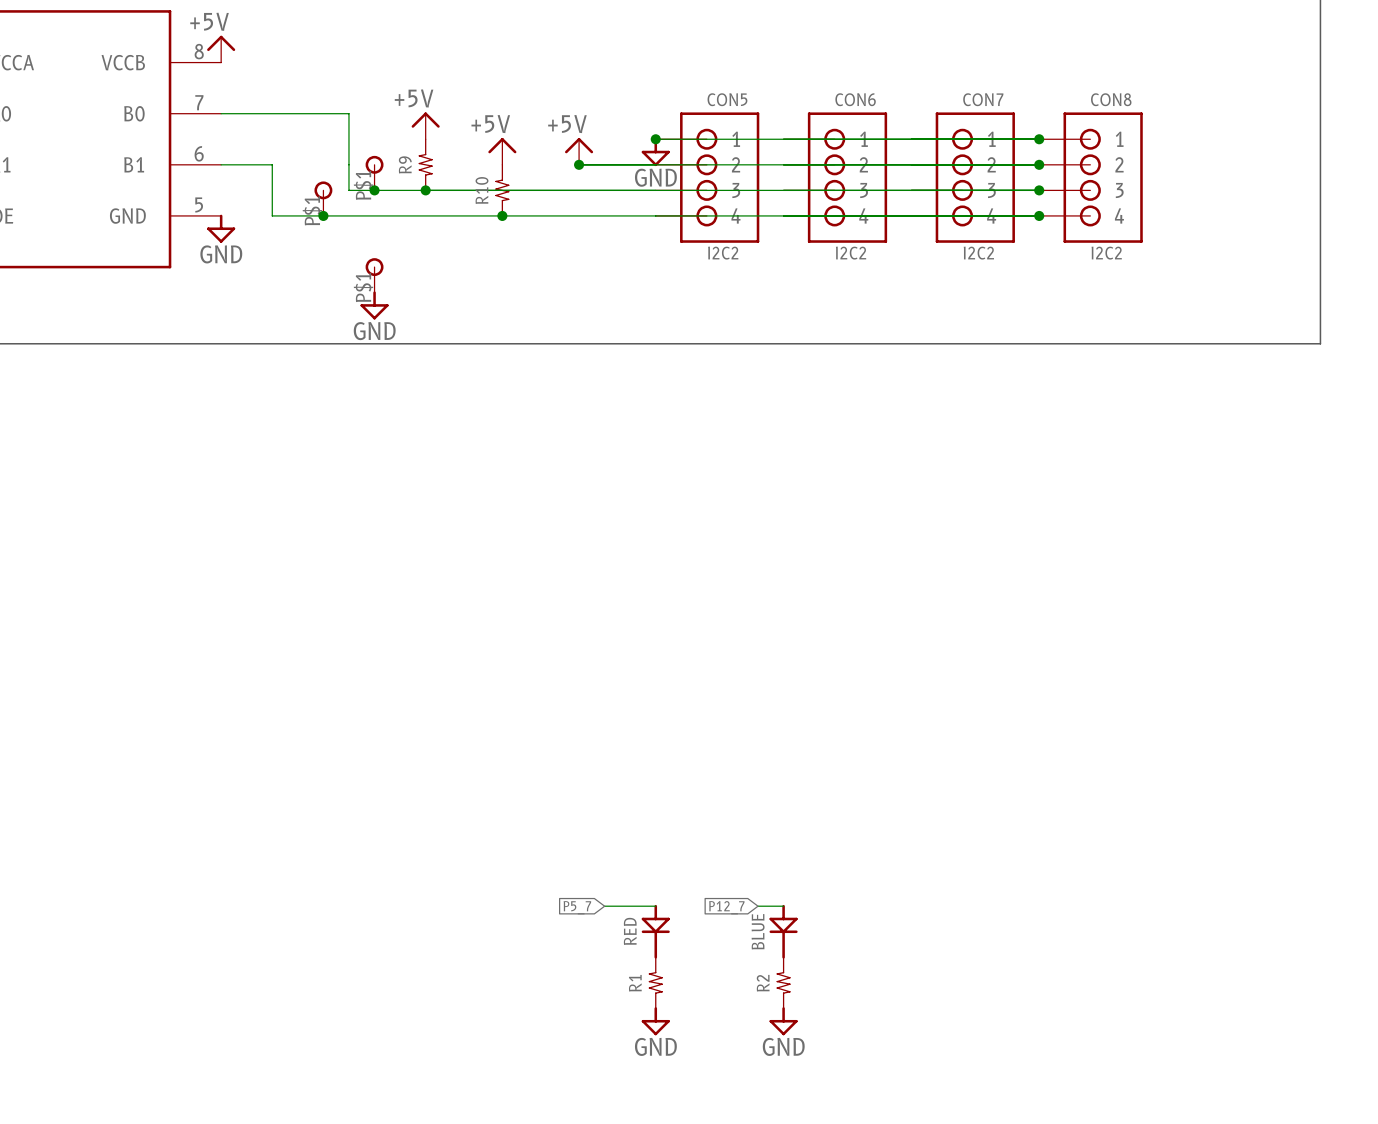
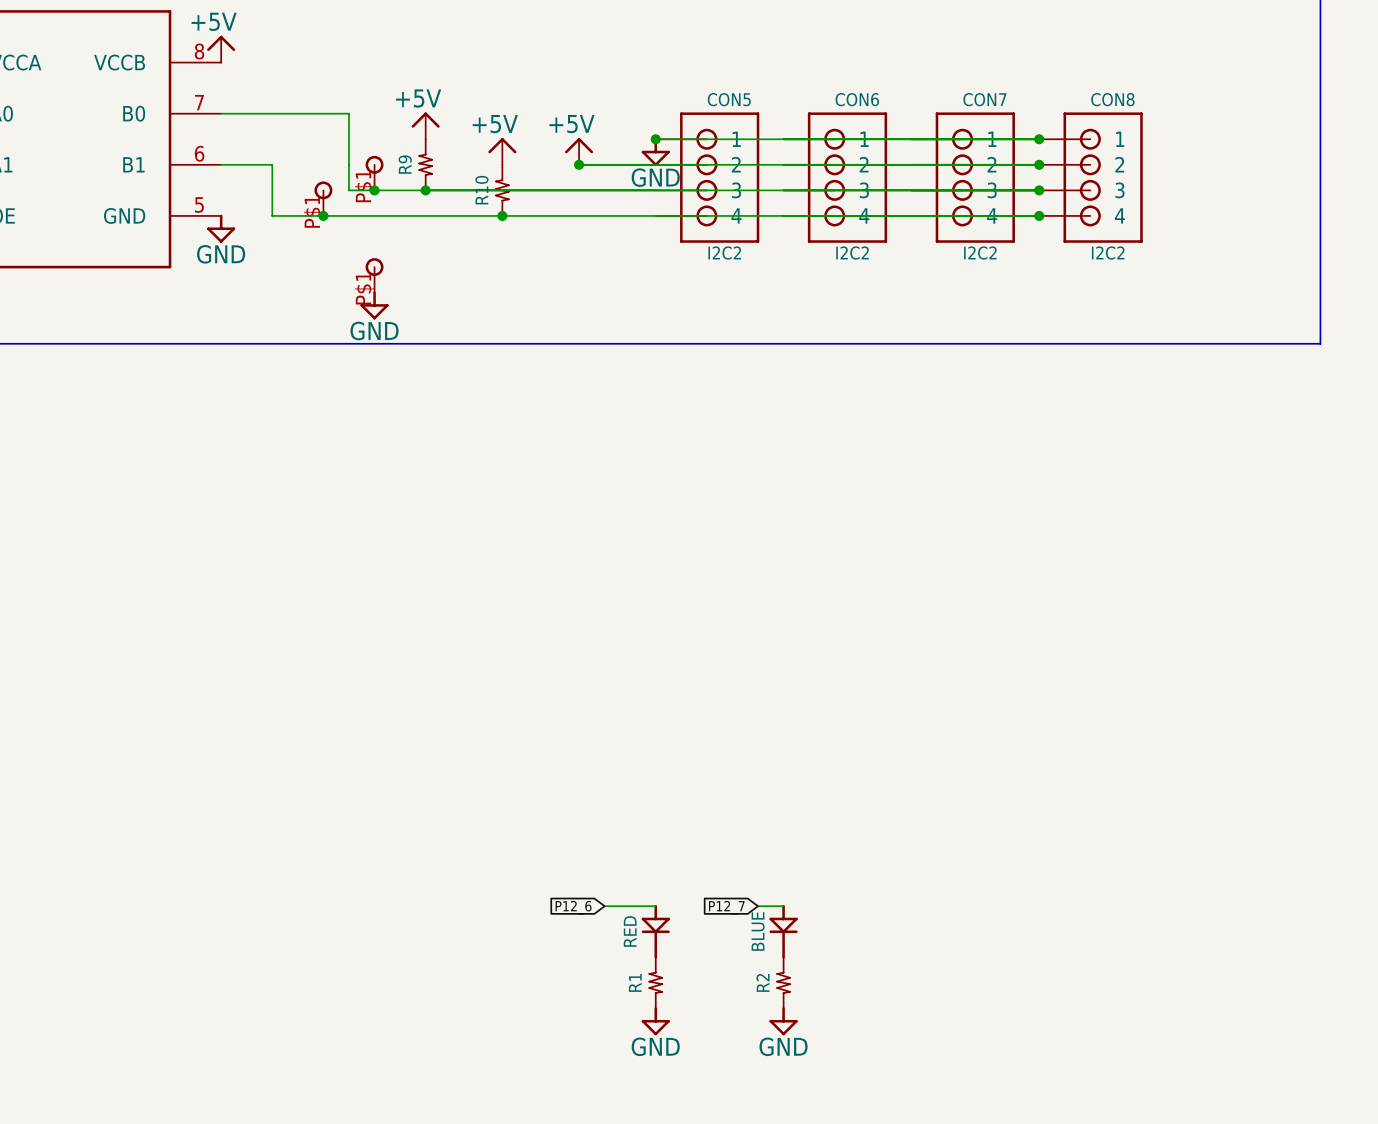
global label: P5_7 (577, 907) -> P12_6 (573, 907)

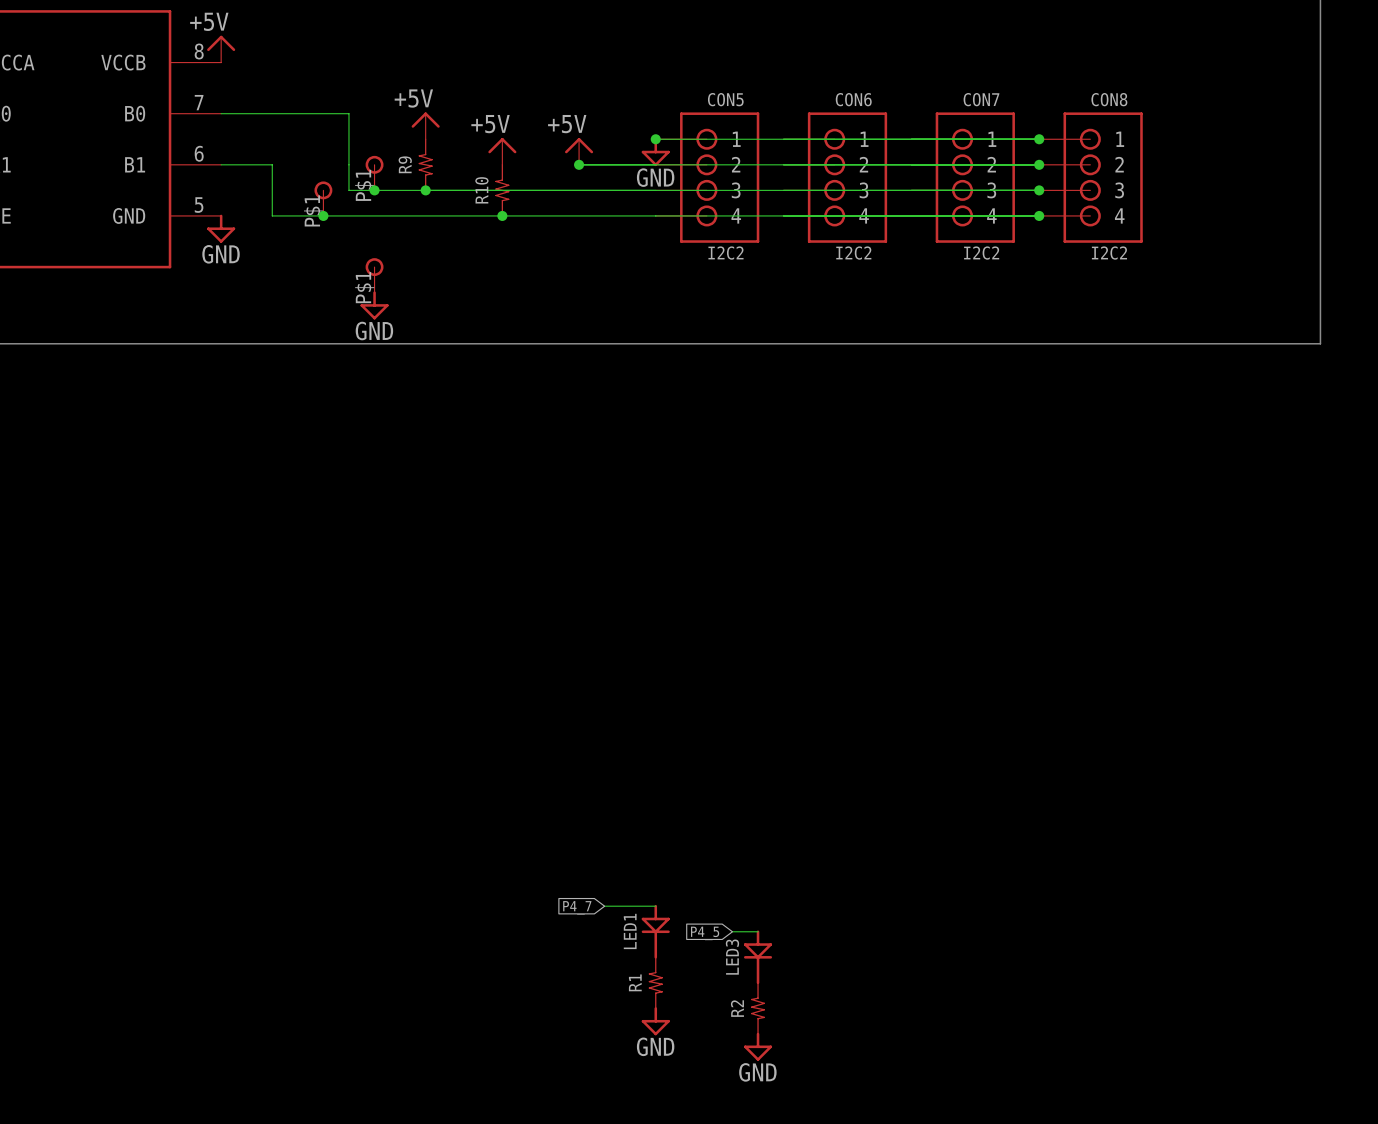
wire: (758, 906) (783, 906) -> (732, 931) (758, 931)
global label: P12_6 (573, 907) -> P4_7 (577, 907)
global label: P12_7 (726, 907) -> none
RED name: RED (630, 931) -> LED1 (630, 931)
BLUE: (783, 931) -> none
global label: none -> P4_5 (705, 933)
LED3: none -> (758, 957)
R2 position: (783, 982) -> (758, 1008)
power symbol position: GND (783, 1021) -> GND (758, 1046)

